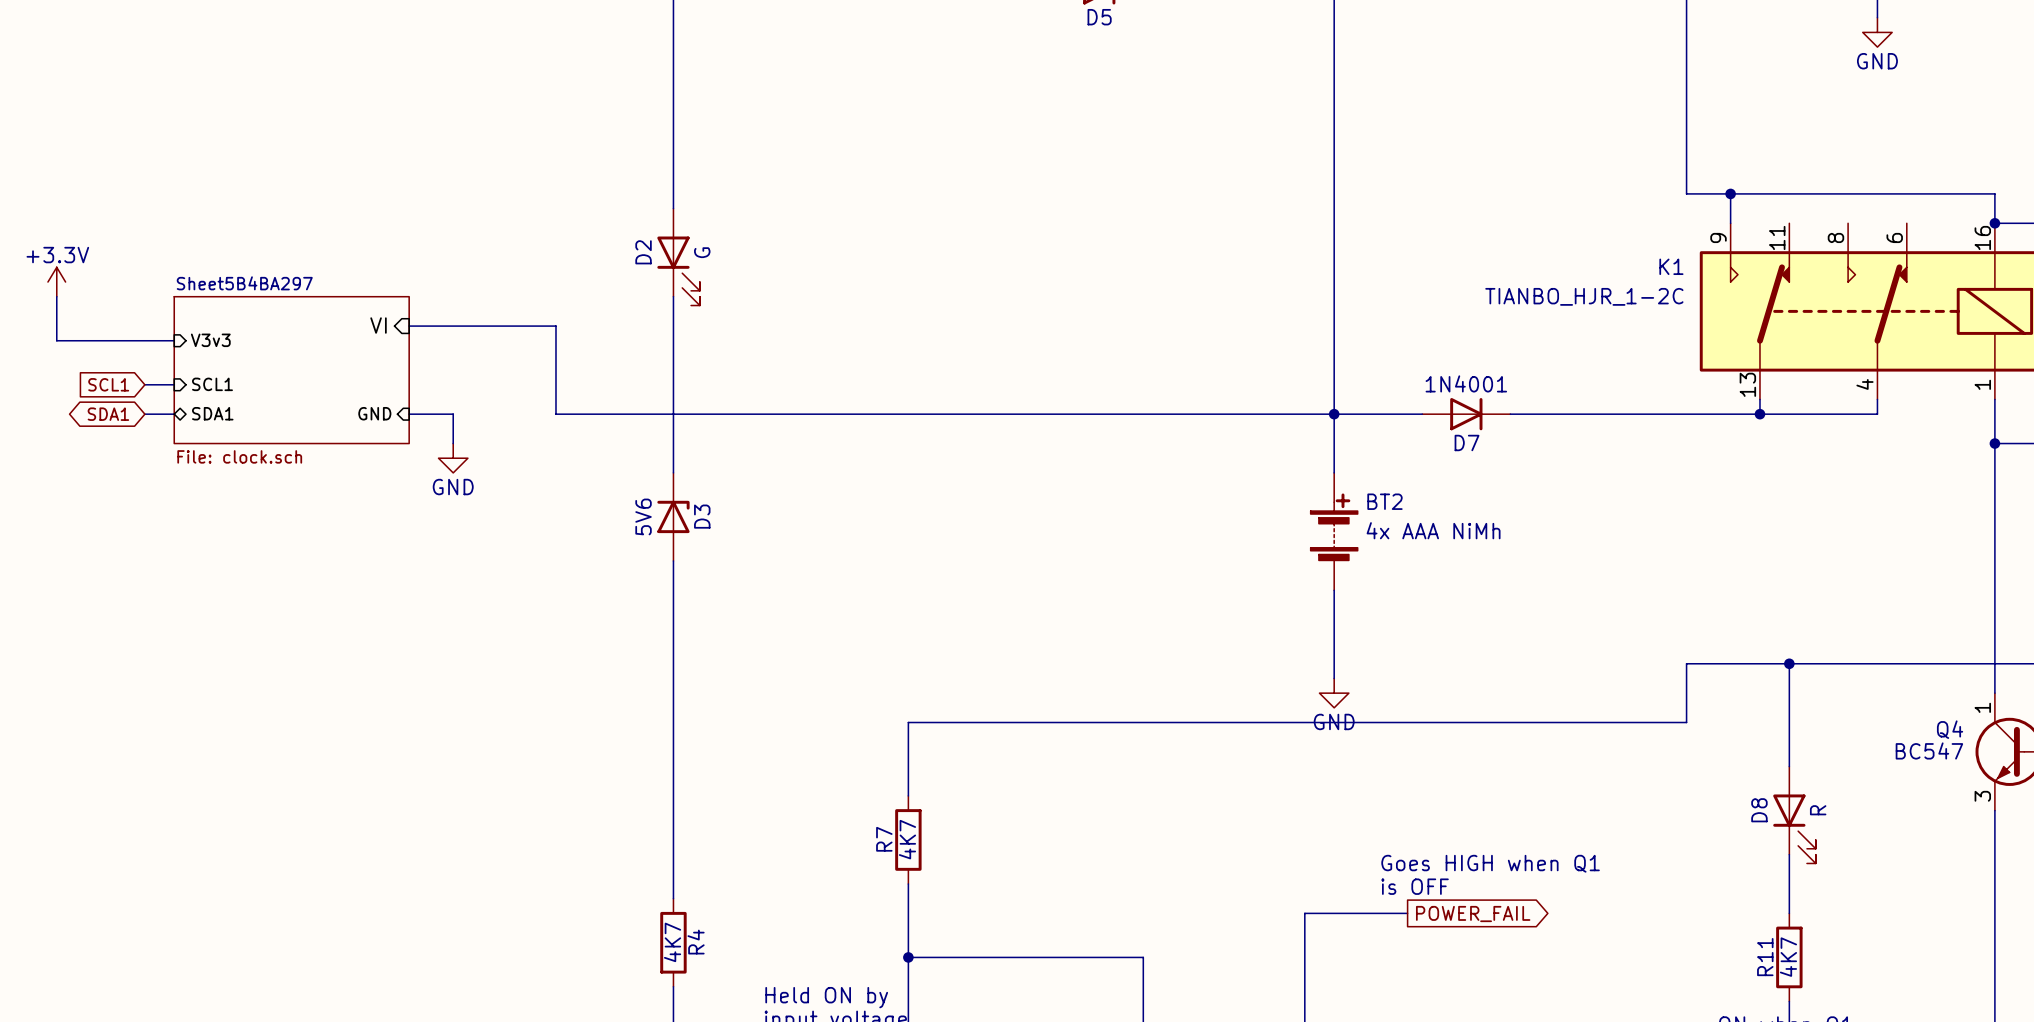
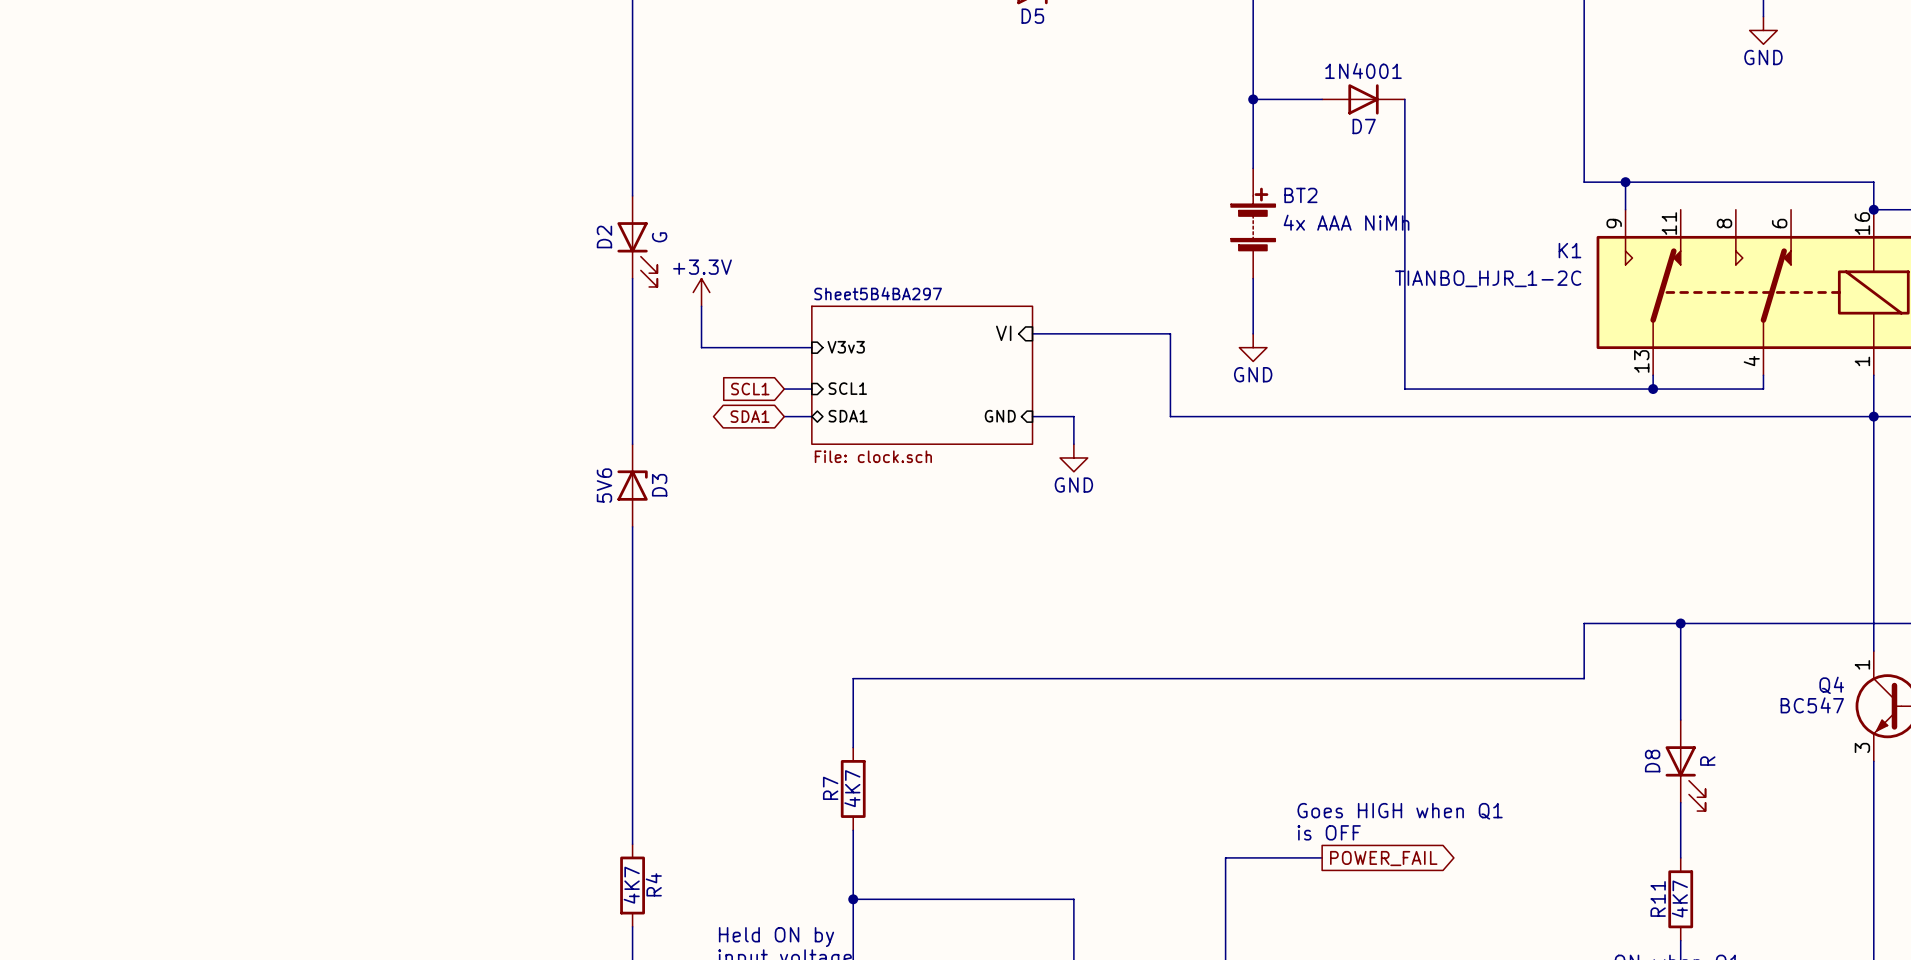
wire: none -> (1253, 99) (1322, 99)
junction: none -> (1253, 99)
wire: none -> (1404, 99) (1404, 389) (1418, 389)
power symbol: +3.3V (56, 282) -> none
wire: (56, 296) (56, 340) (174, 340) -> none
power symbol: none -> +3.3V (701, 292)
sheet pin: VI (378, 325) -> none
wire: (409, 326) (555, 326) (555, 414) (834, 414) -> none
wire: none -> (701, 306) (701, 347) (811, 347)
sheet pin: V3v3 (210, 340) -> none
sheet pin: none -> VI (1003, 333)
wire: none -> (1032, 333) (1170, 333) (1170, 416) (1873, 416)
wire: (1334, 355) (1334, 472) -> none
sheet pin: none -> V3v3 (846, 347)
sheet Sheet5B4BA297 position: (291, 370) -> (922, 375)
power symbol: none -> GND (1253, 347)
global label: SCL1 (108, 384) -> none
wire: (144, 384) (174, 384) -> none
sheet pin: SCL1 (212, 384) -> none
sheet pin: SDA1 (212, 413) -> none
sheet pin: GND (374, 413) -> none
sheet pin: none -> SCL1 (847, 388)
global label: SDA1 (108, 414) -> none
wire: (144, 414) (174, 414) -> none
wire: (409, 414) (453, 414) (453, 443) -> none
global label: none -> SCL1 (750, 389)
wire: (864, 414) (1422, 414) -> none
junction: (1334, 414) -> none
D7 position: (1466, 414) -> (1363, 99)
global label: none -> SDA1 (750, 416)
wire: none -> (784, 416) (811, 416)
sheet pin: none -> SDA1 (848, 416)
sheet pin: none -> GND (1000, 416)
wire: none -> (1032, 416) (1073, 416) (1073, 444)
power symbol: GND (453, 458) -> none
power symbol: none -> GND (1073, 457)
BT2 position: (1334, 531) -> (1253, 223)
wire: (1334, 590) (1334, 678) -> none
power symbol: GND (1334, 693) -> none

